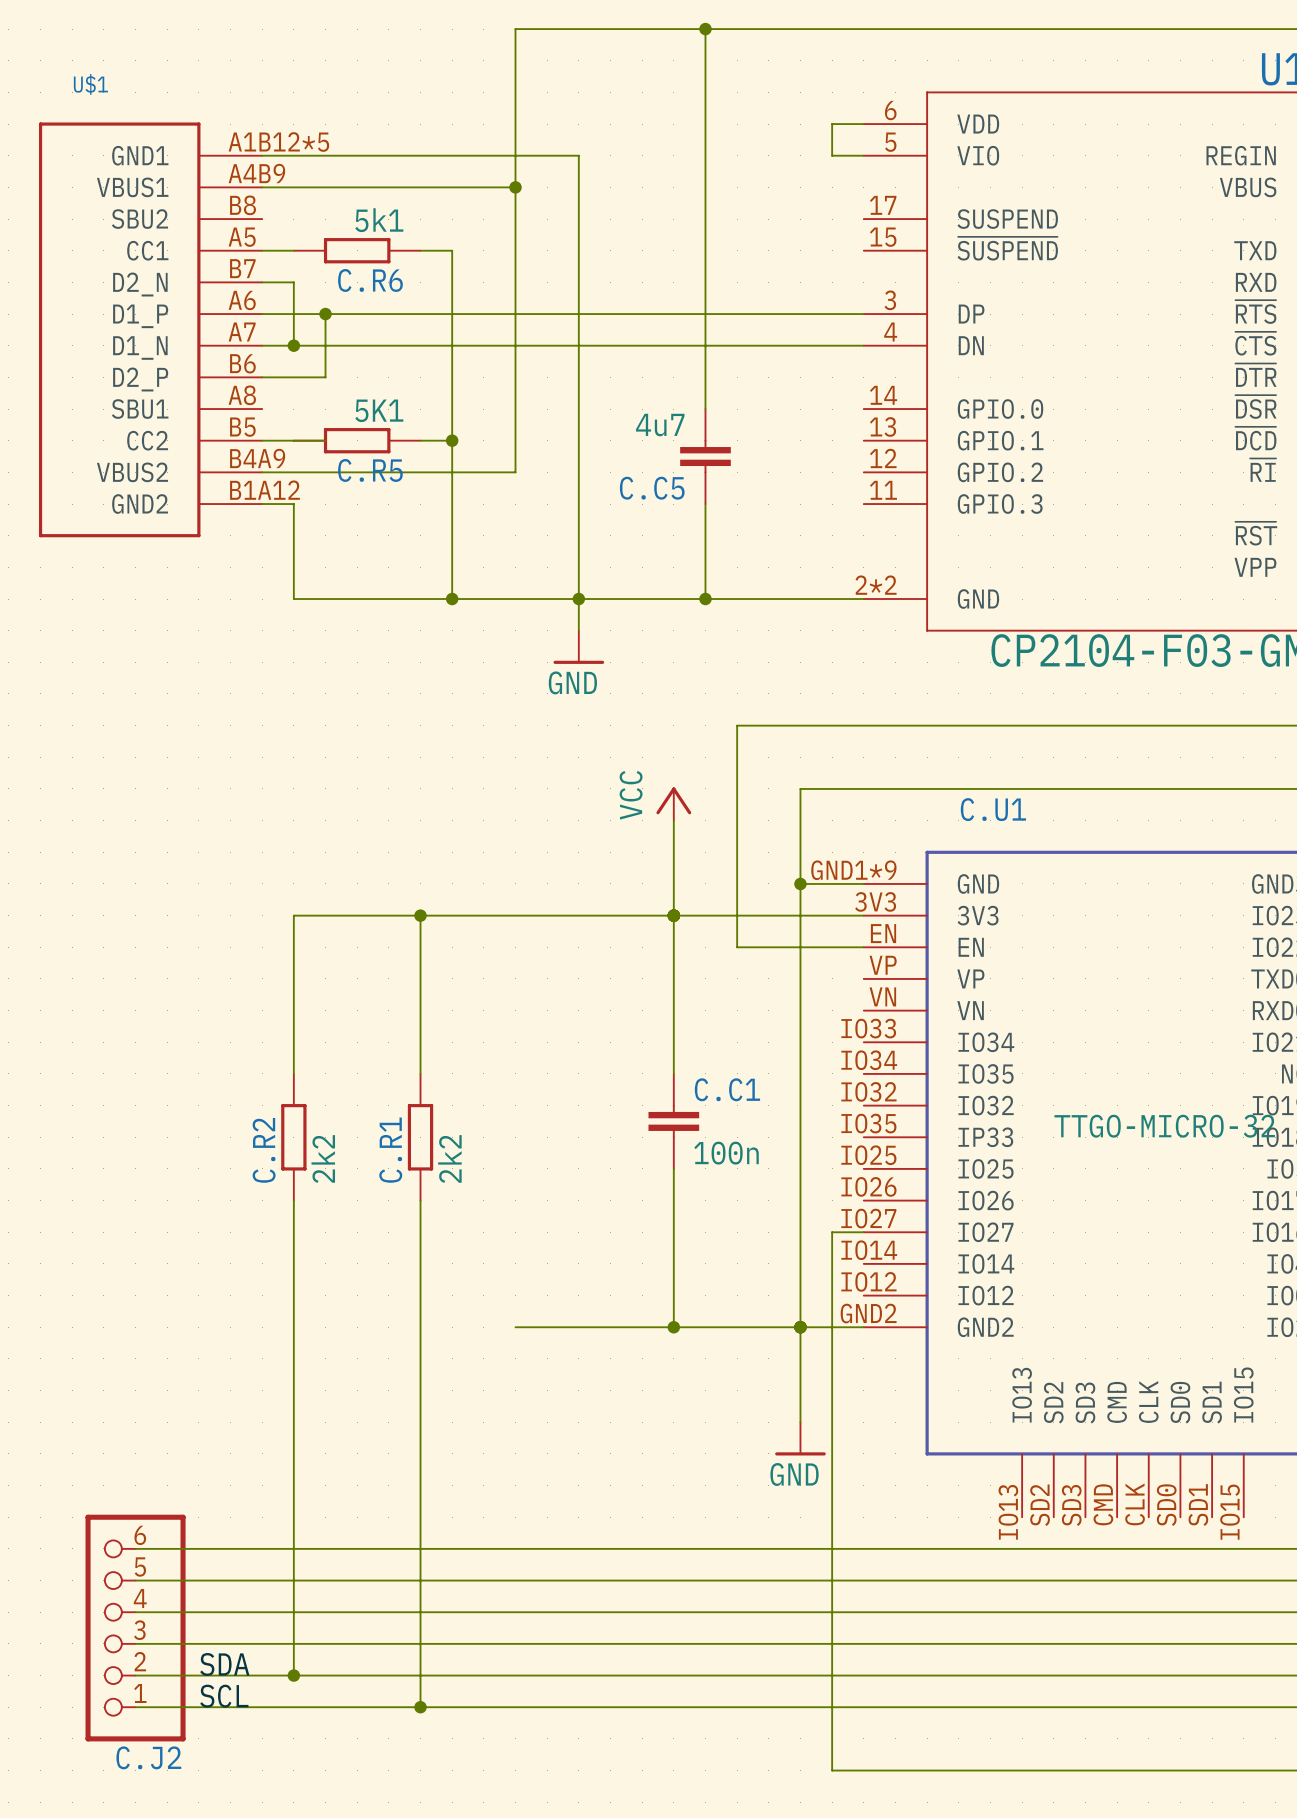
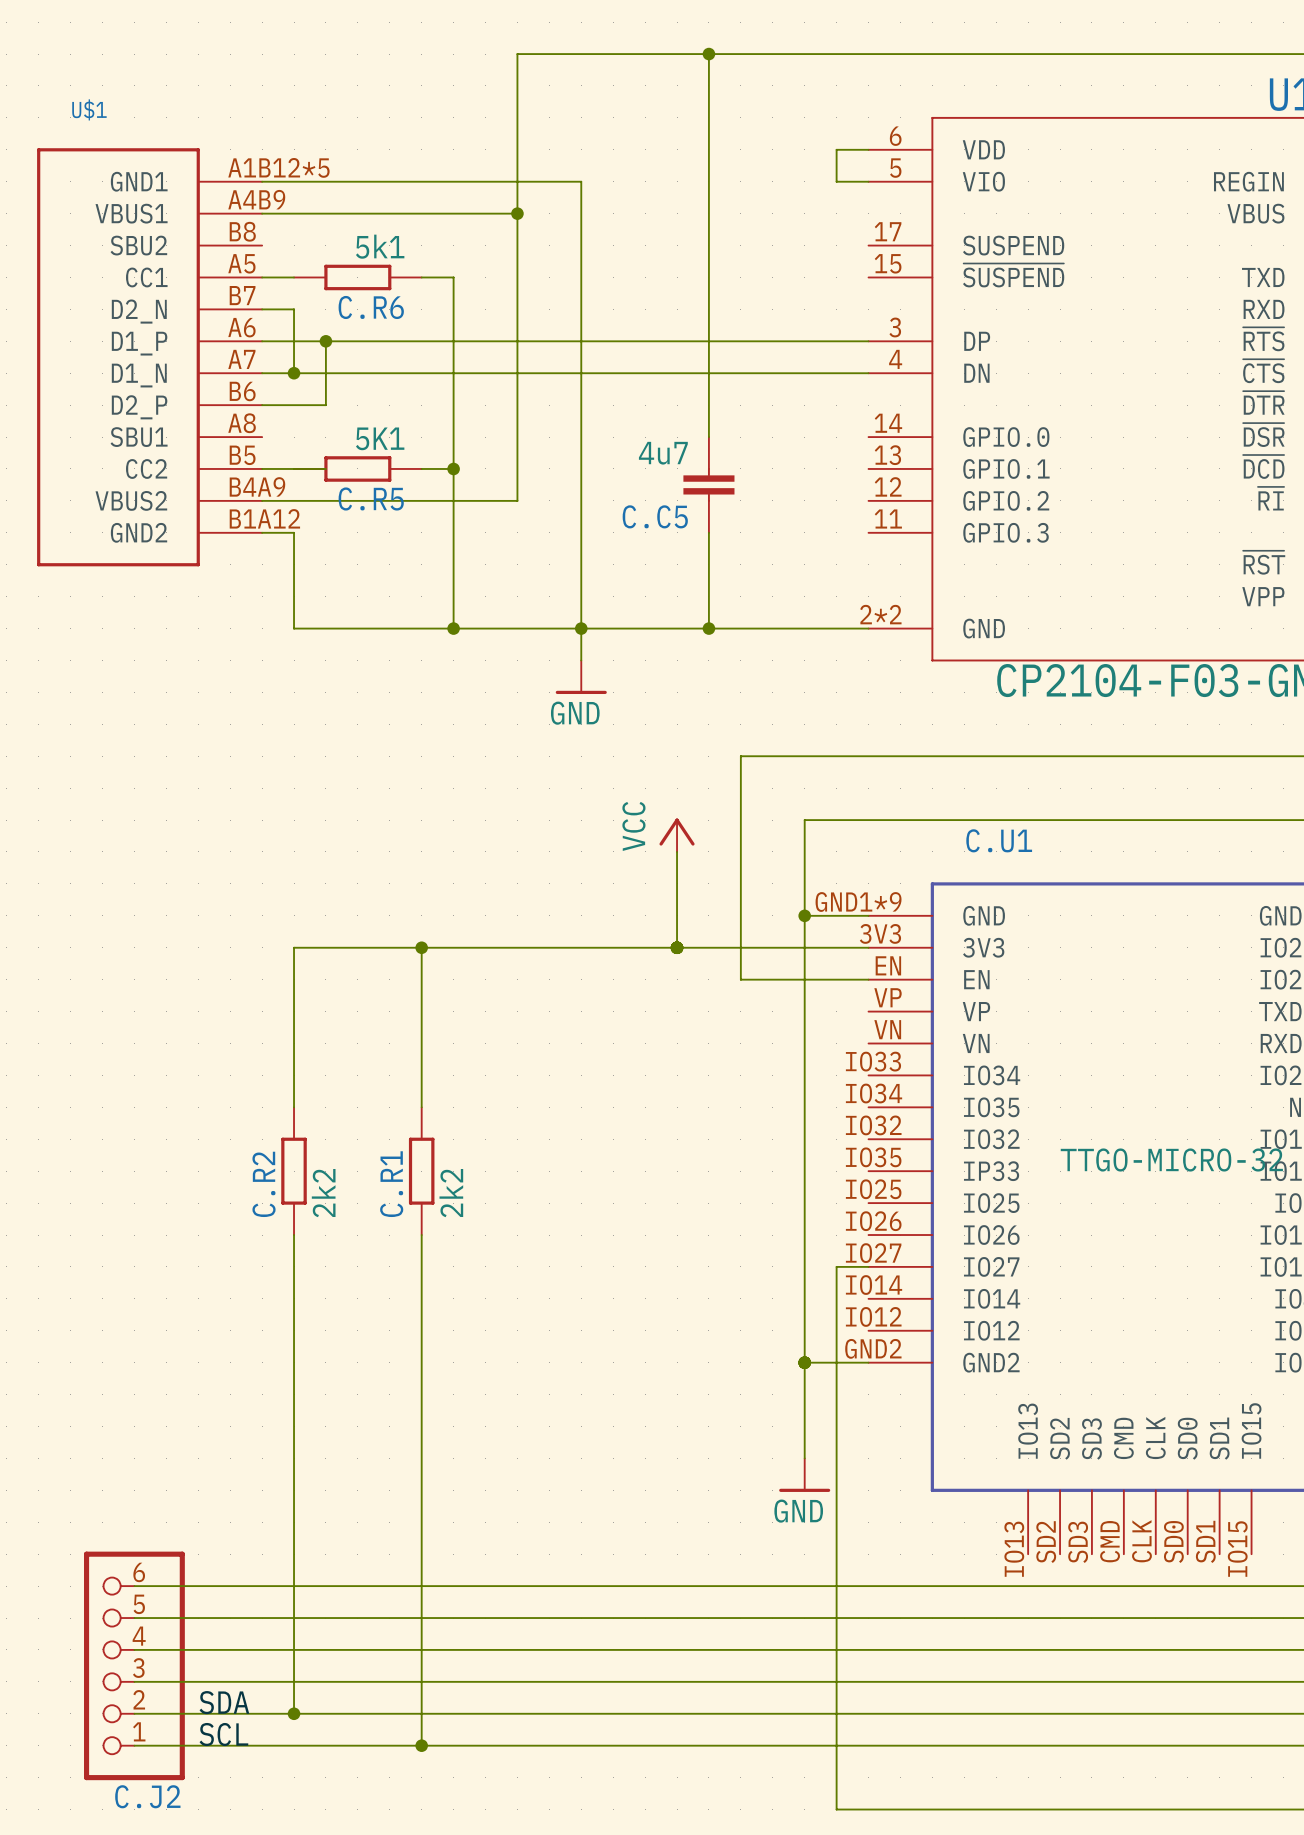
wire: (673, 915) (673, 1073) -> none
C.C1: 100n (673, 1121) -> none
wire: (673, 1168) (673, 1327) -> none
wire: (515, 1327) (800, 1327) -> none
junction: (673, 1327) -> none

